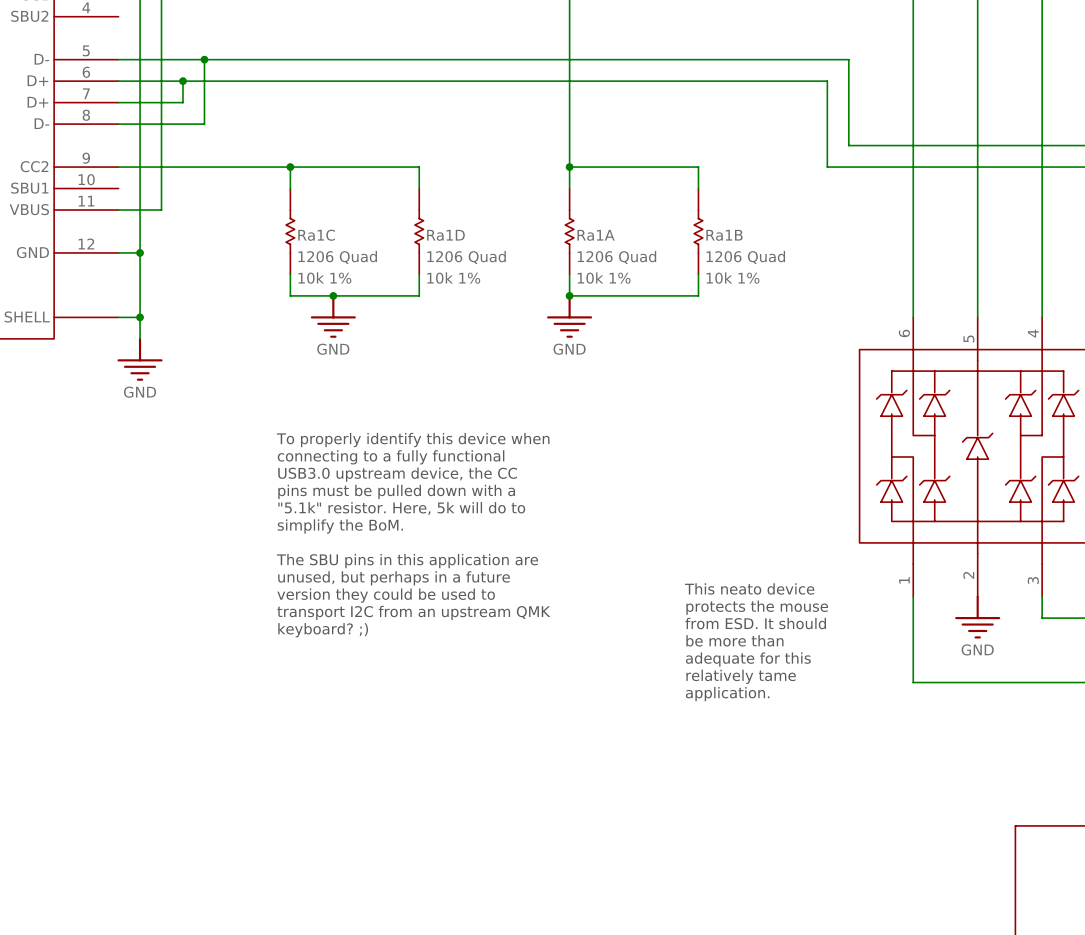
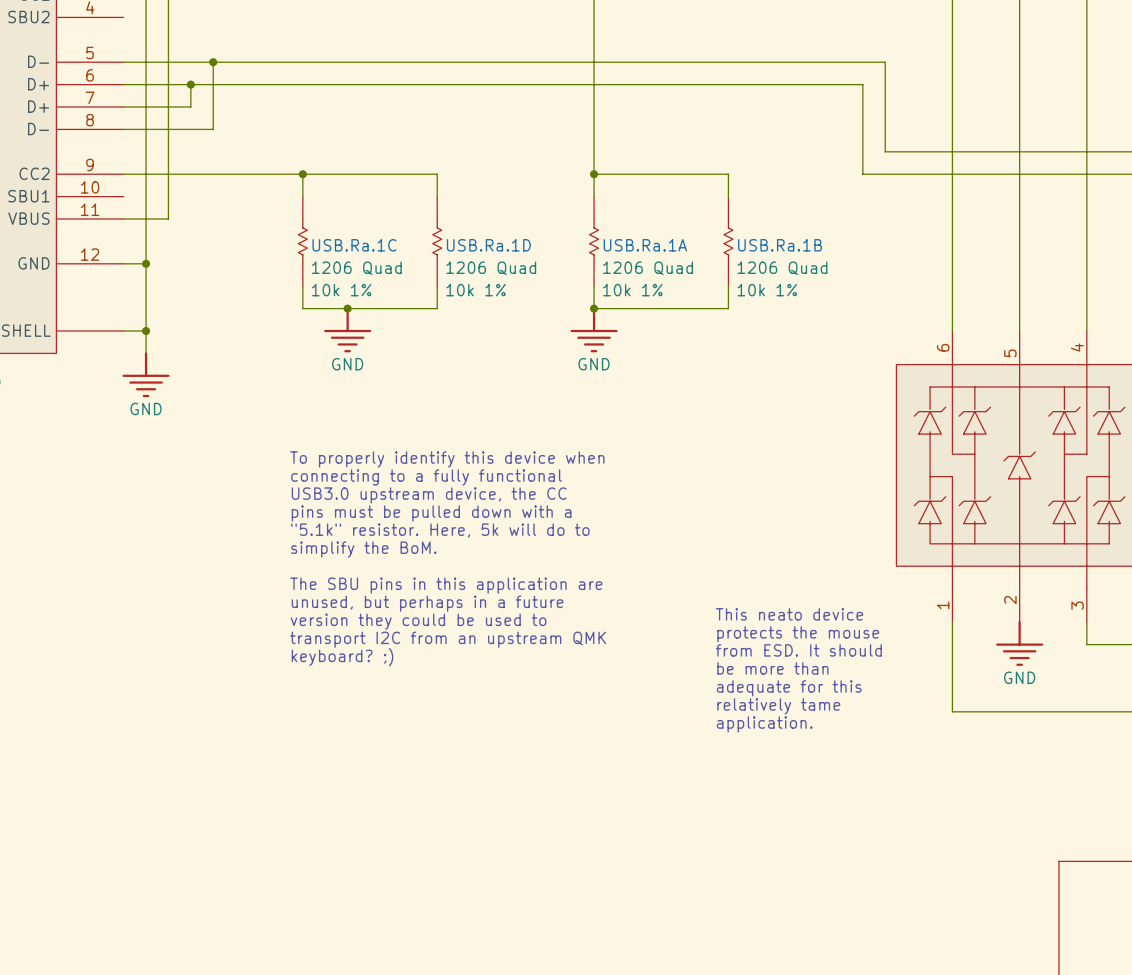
Ra1C name: Ra1C (316, 235) -> USB.Ra.1C (354, 245)
Ra1D name: Ra1D (445, 235) -> USB.Ra.1D (488, 245)
Ra1A name: Ra1A (596, 235) -> USB.Ra.1A (645, 245)
Ra1B name: Ra1B (724, 235) -> USB.Ra.1B (780, 245)

